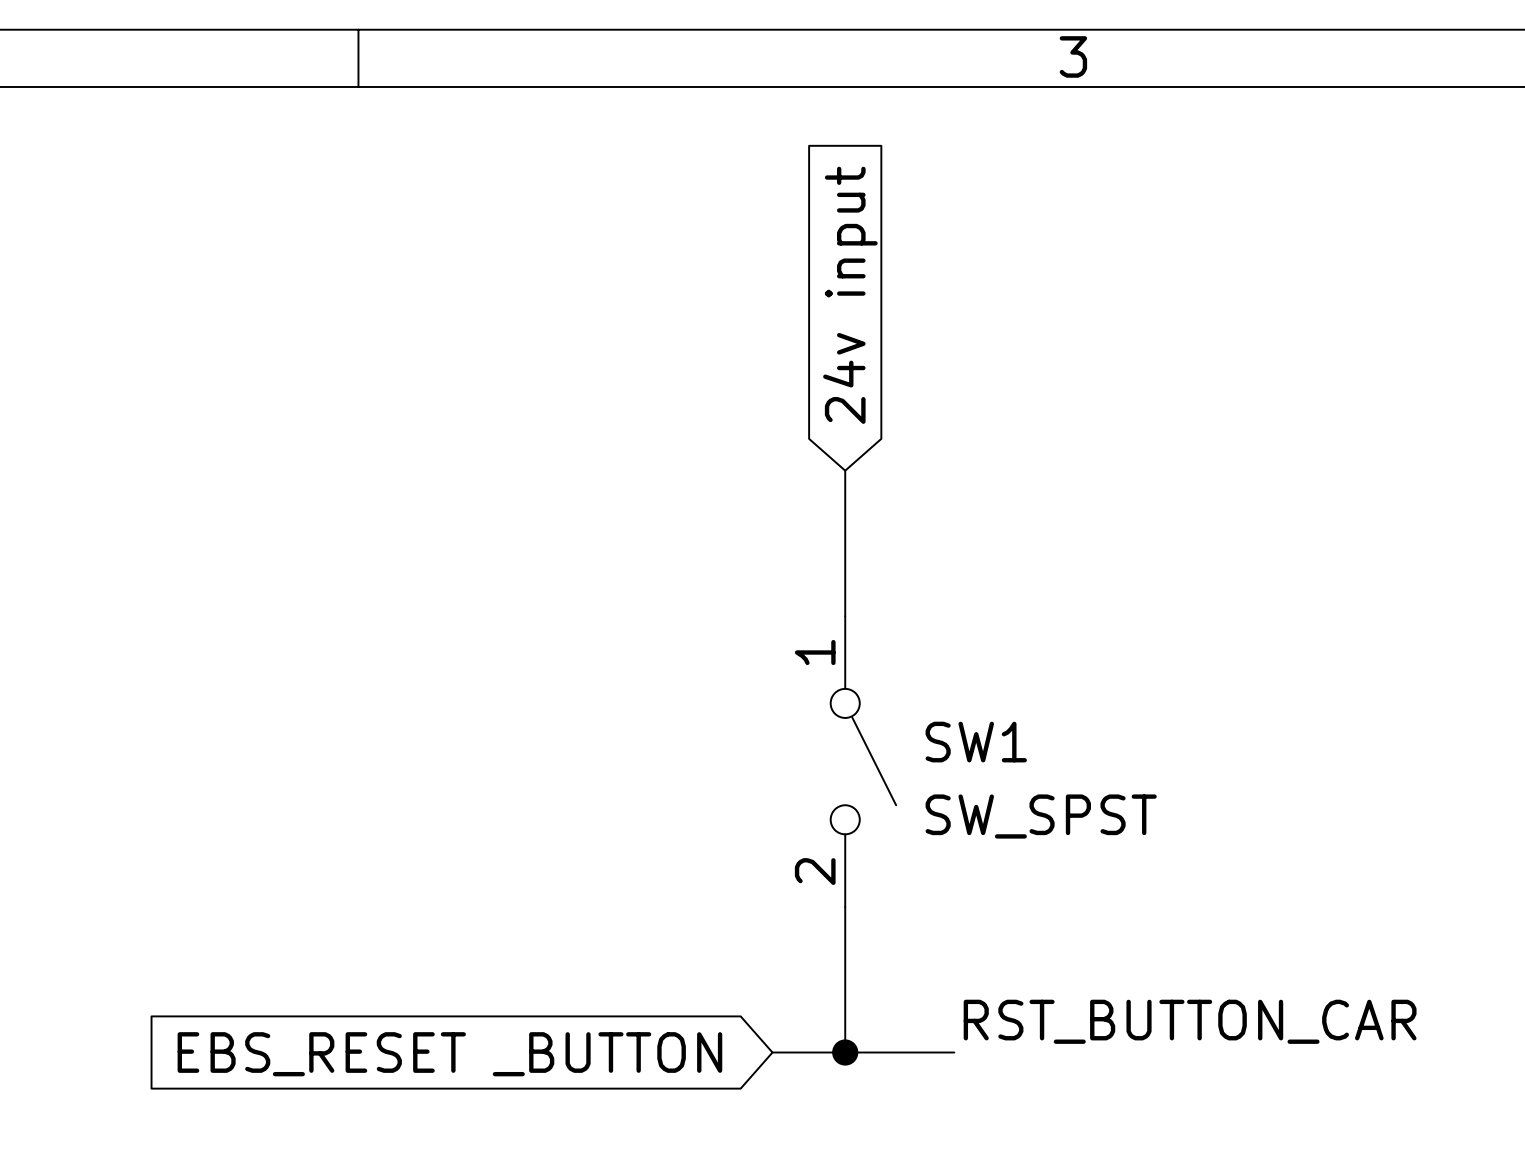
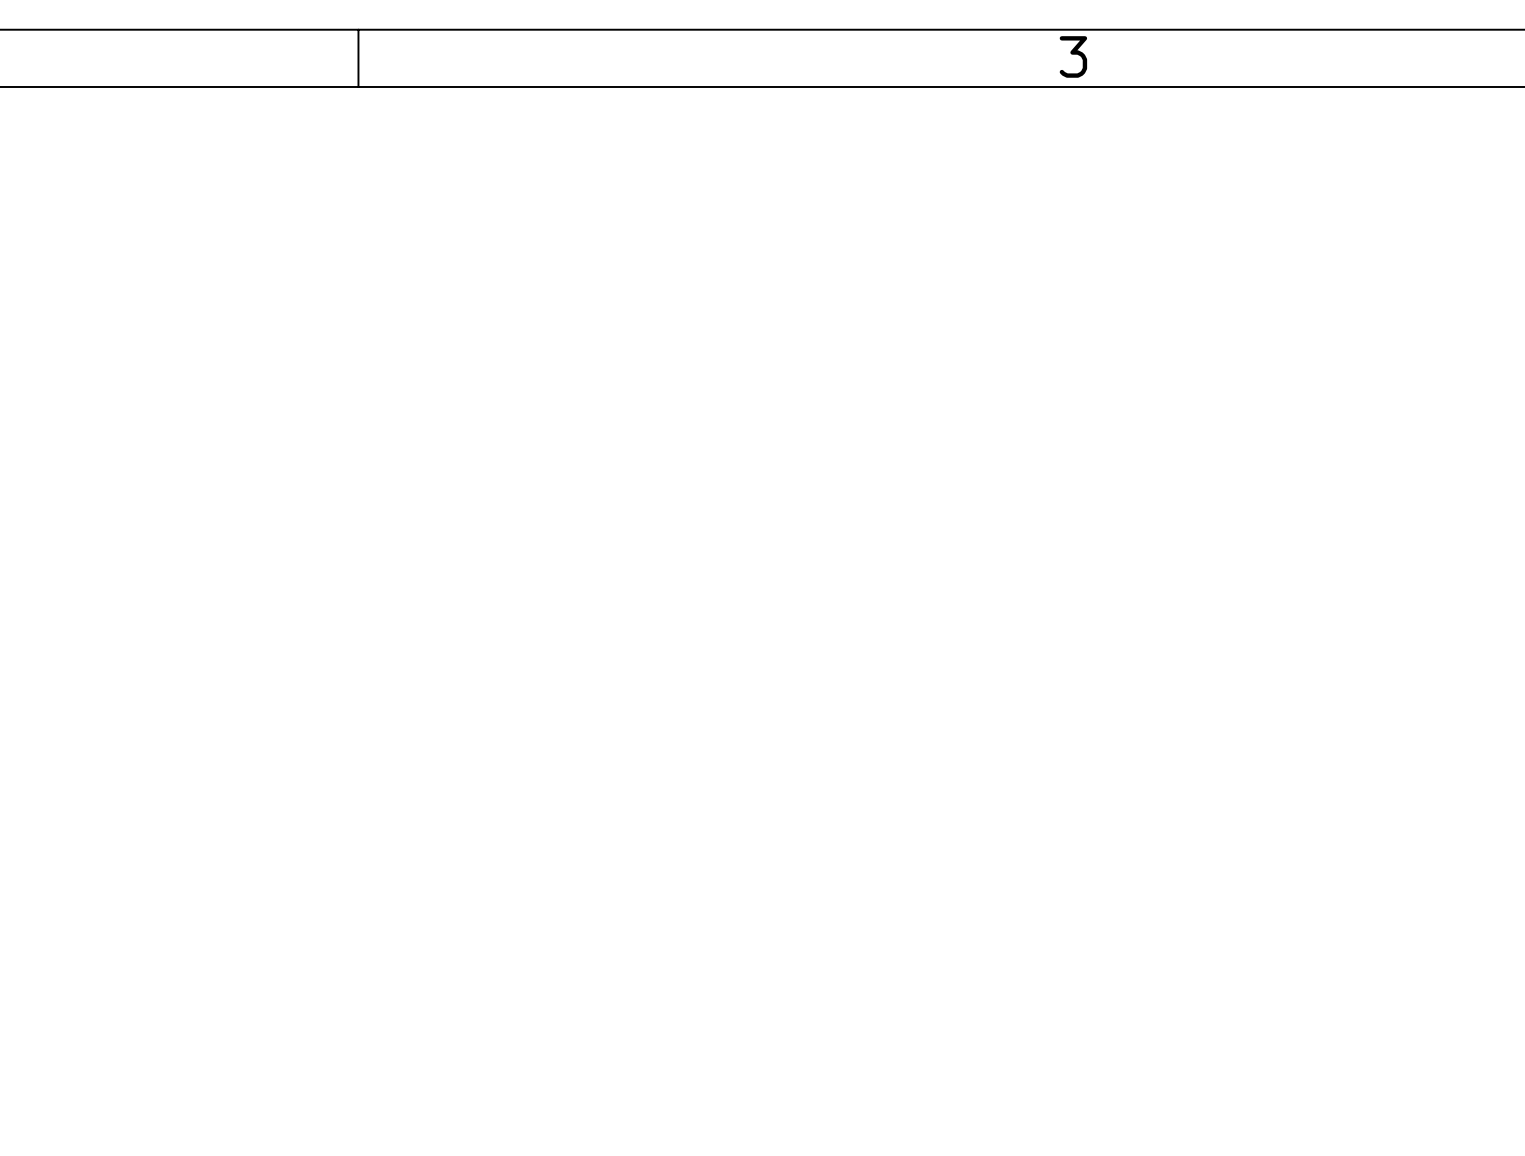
global label: 24v input (850, 295) -> none
wire: (845, 470) (845, 616) -> none
SW1: SW_SPST (863, 761) -> none
wire: (845, 907) (845, 1052) -> none
label: RST_BUTTON_CAR (1190, 1021) -> none
wire: (772, 1052) (954, 1052) -> none
junction: (845, 1052) -> none
global label: EBS_RESET _BUTTON (449, 1054) -> none

